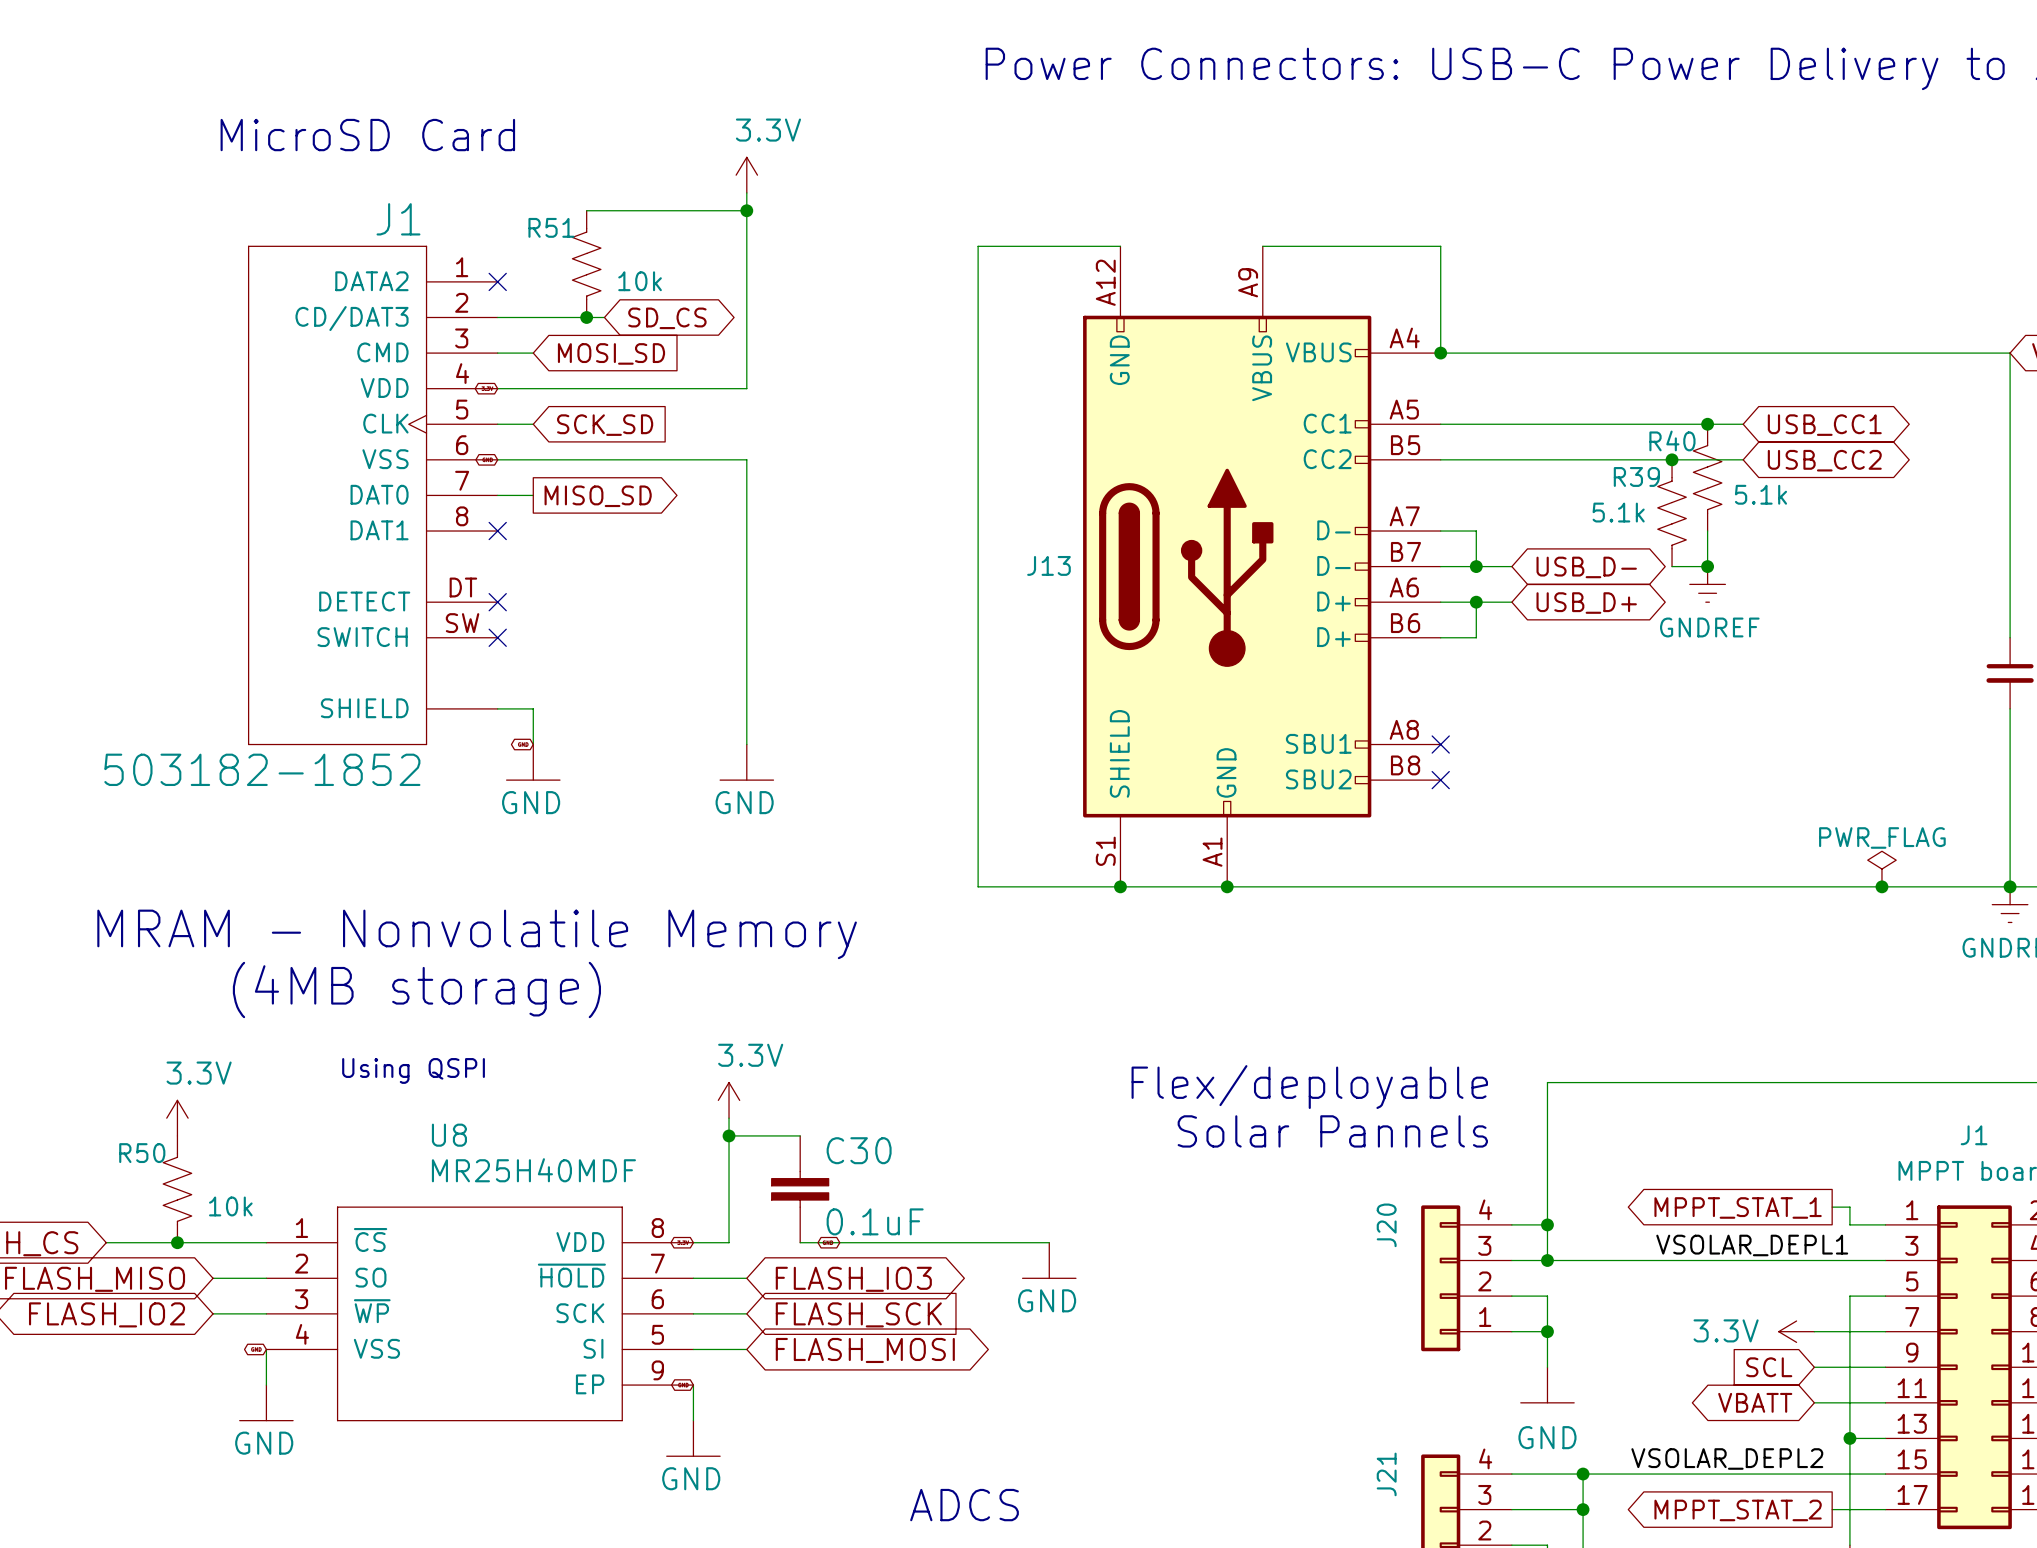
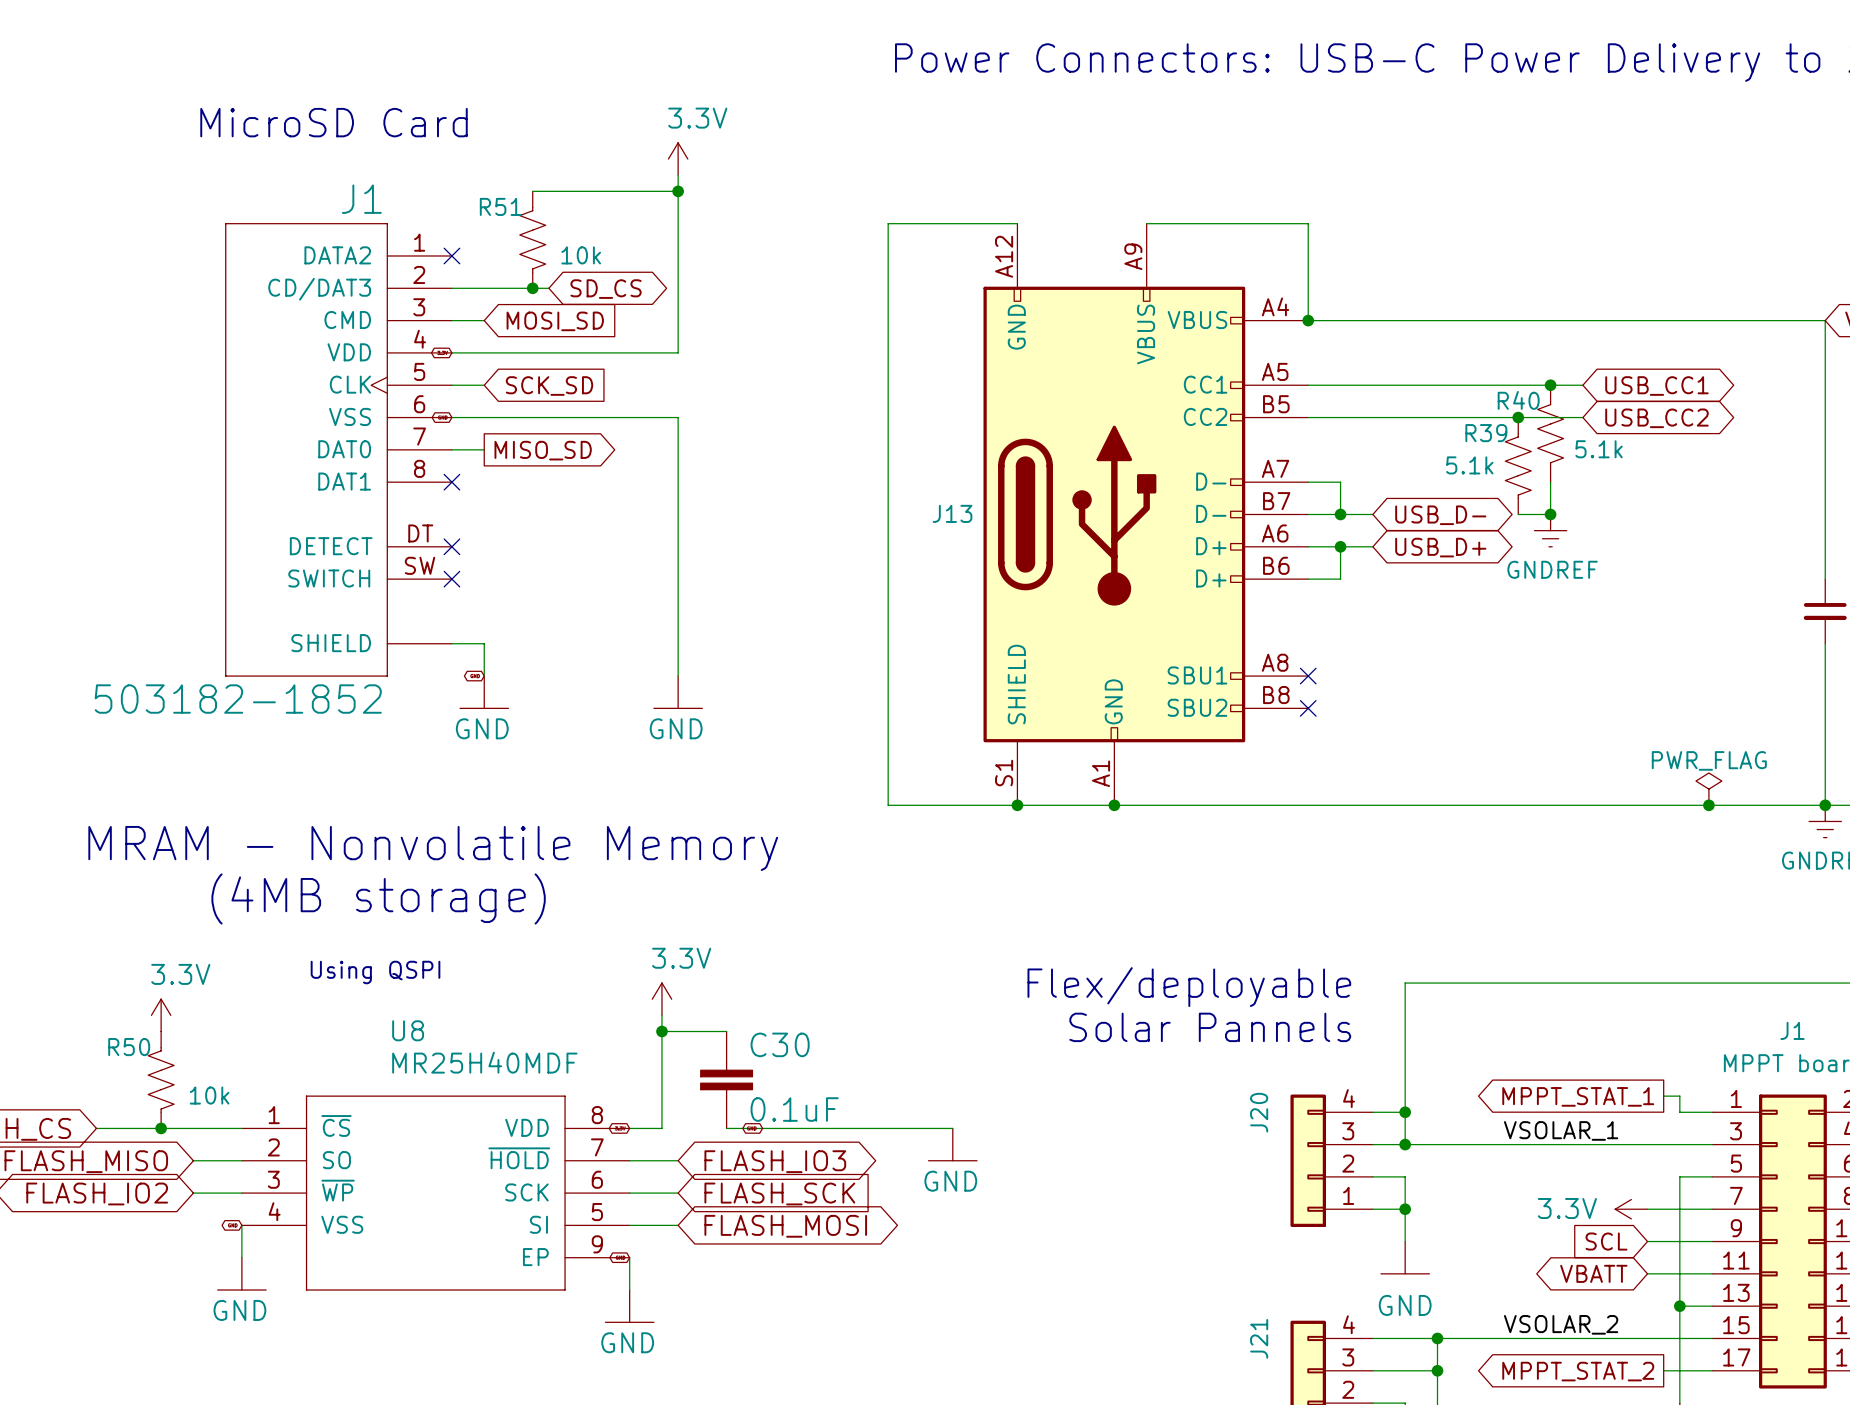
label: VSOLAR_DEPL1 (1752, 1245) -> VSOLAR_1 (1561, 1130)
label: VSOLAR_DEPL2 (1727, 1458) -> VSOLAR_2 (1561, 1324)
text: ADCS (964, 1505) -> none

